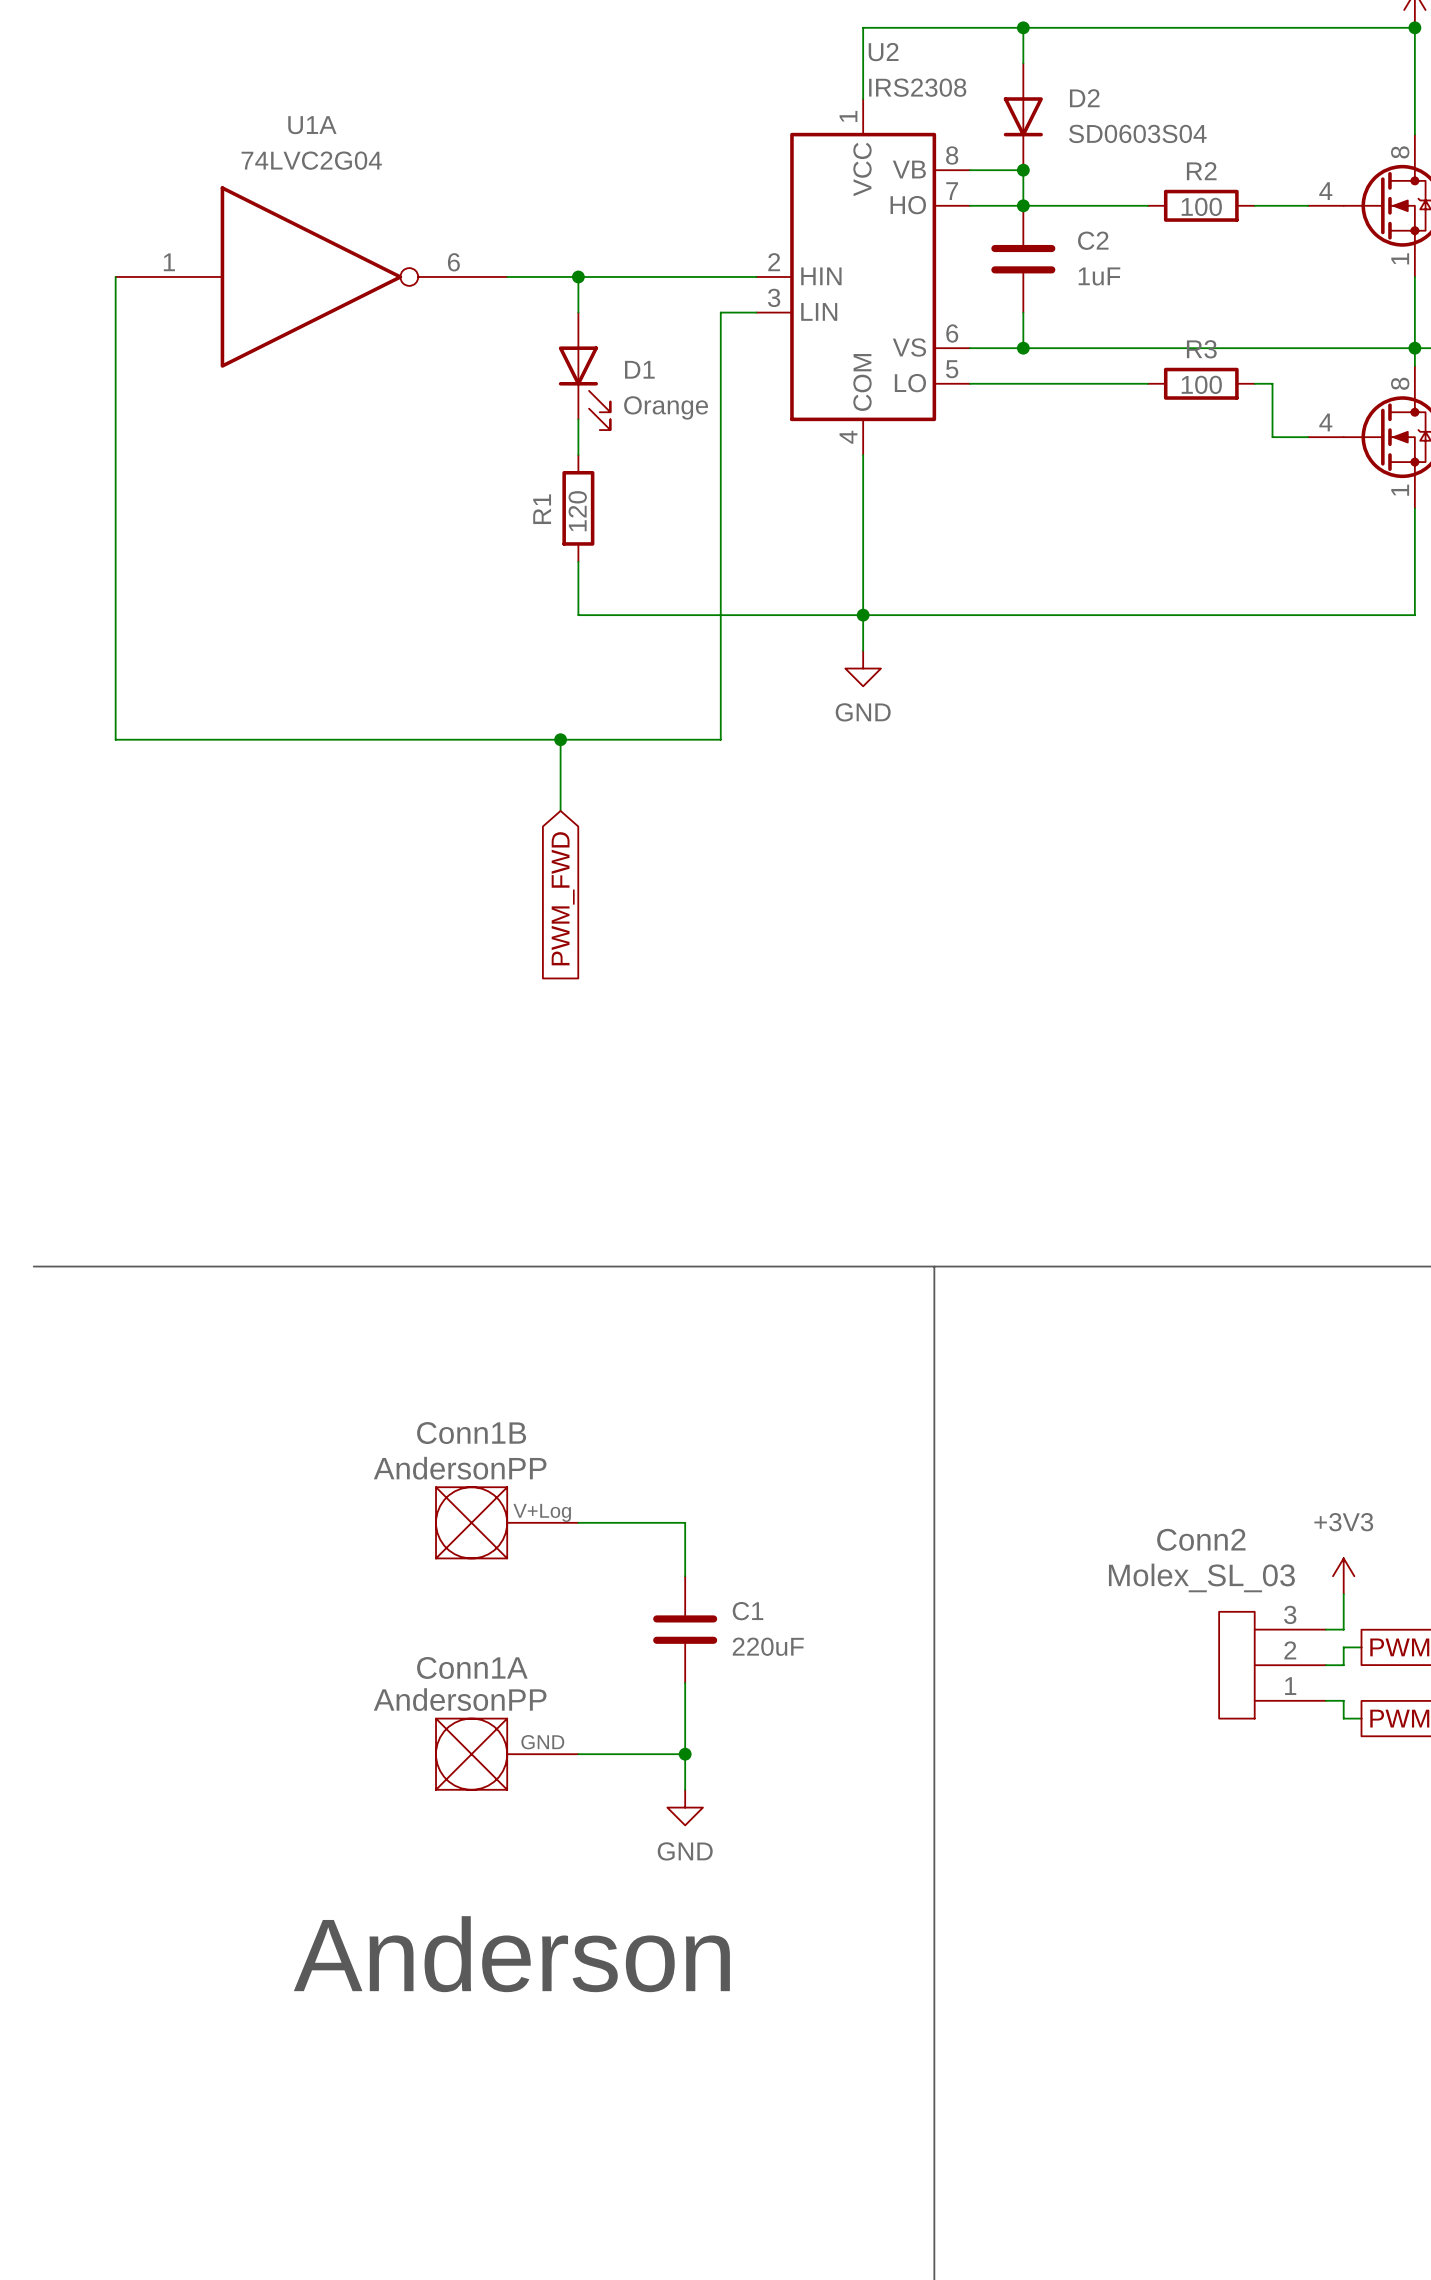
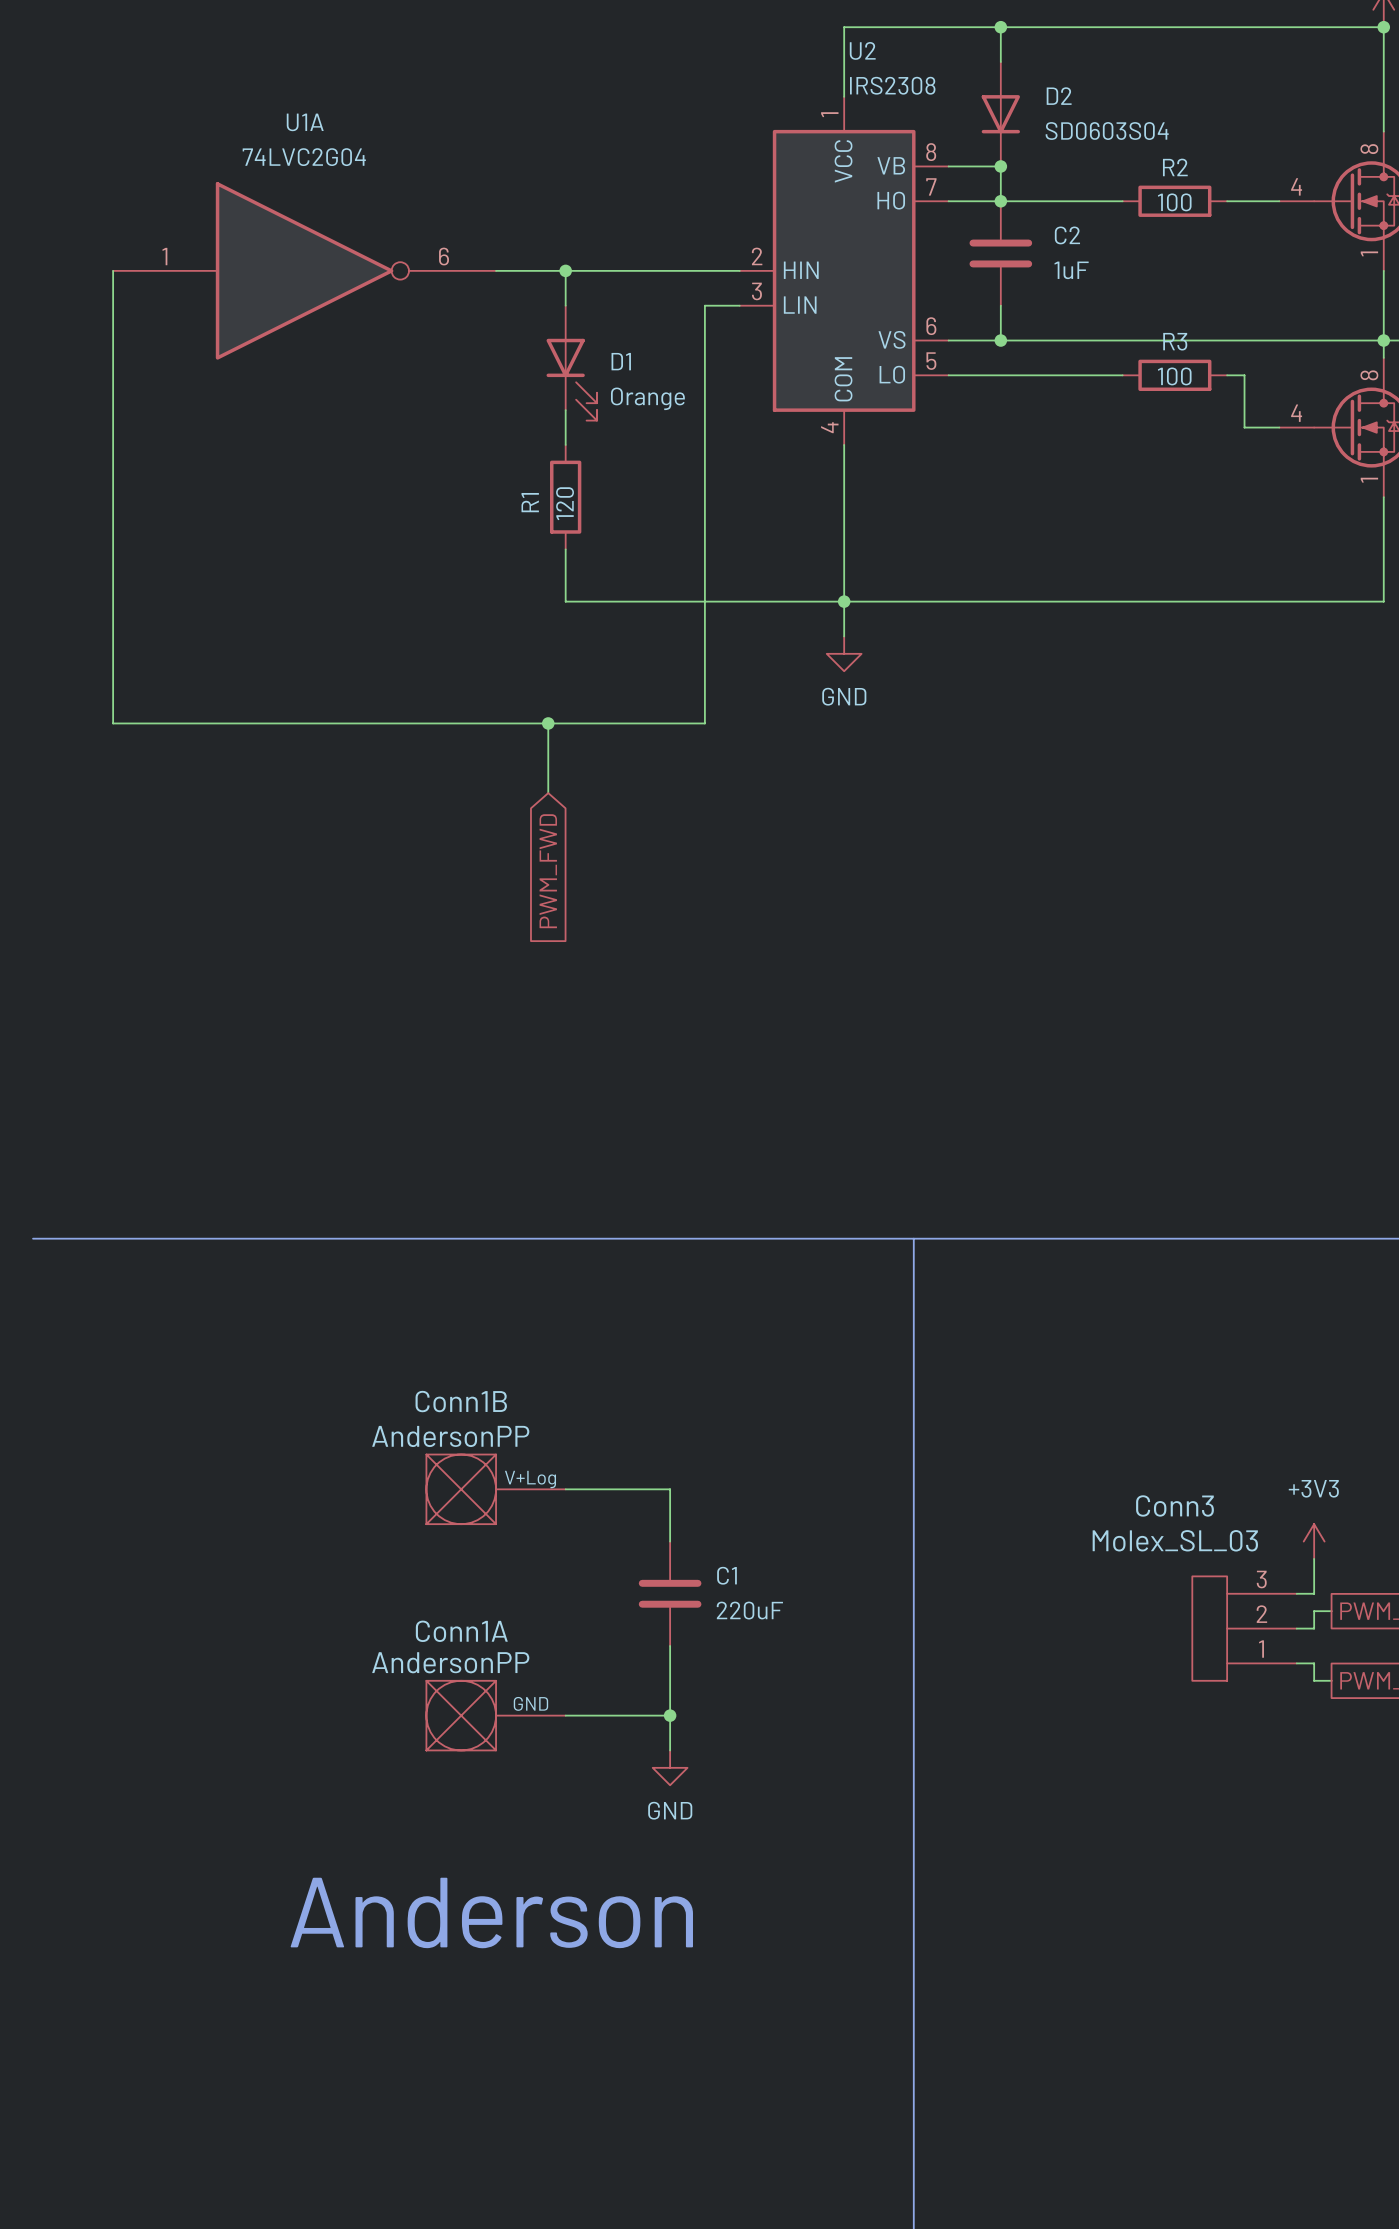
Conn2 name: Conn2 (1201, 1539) -> Conn3 (1175, 1505)

